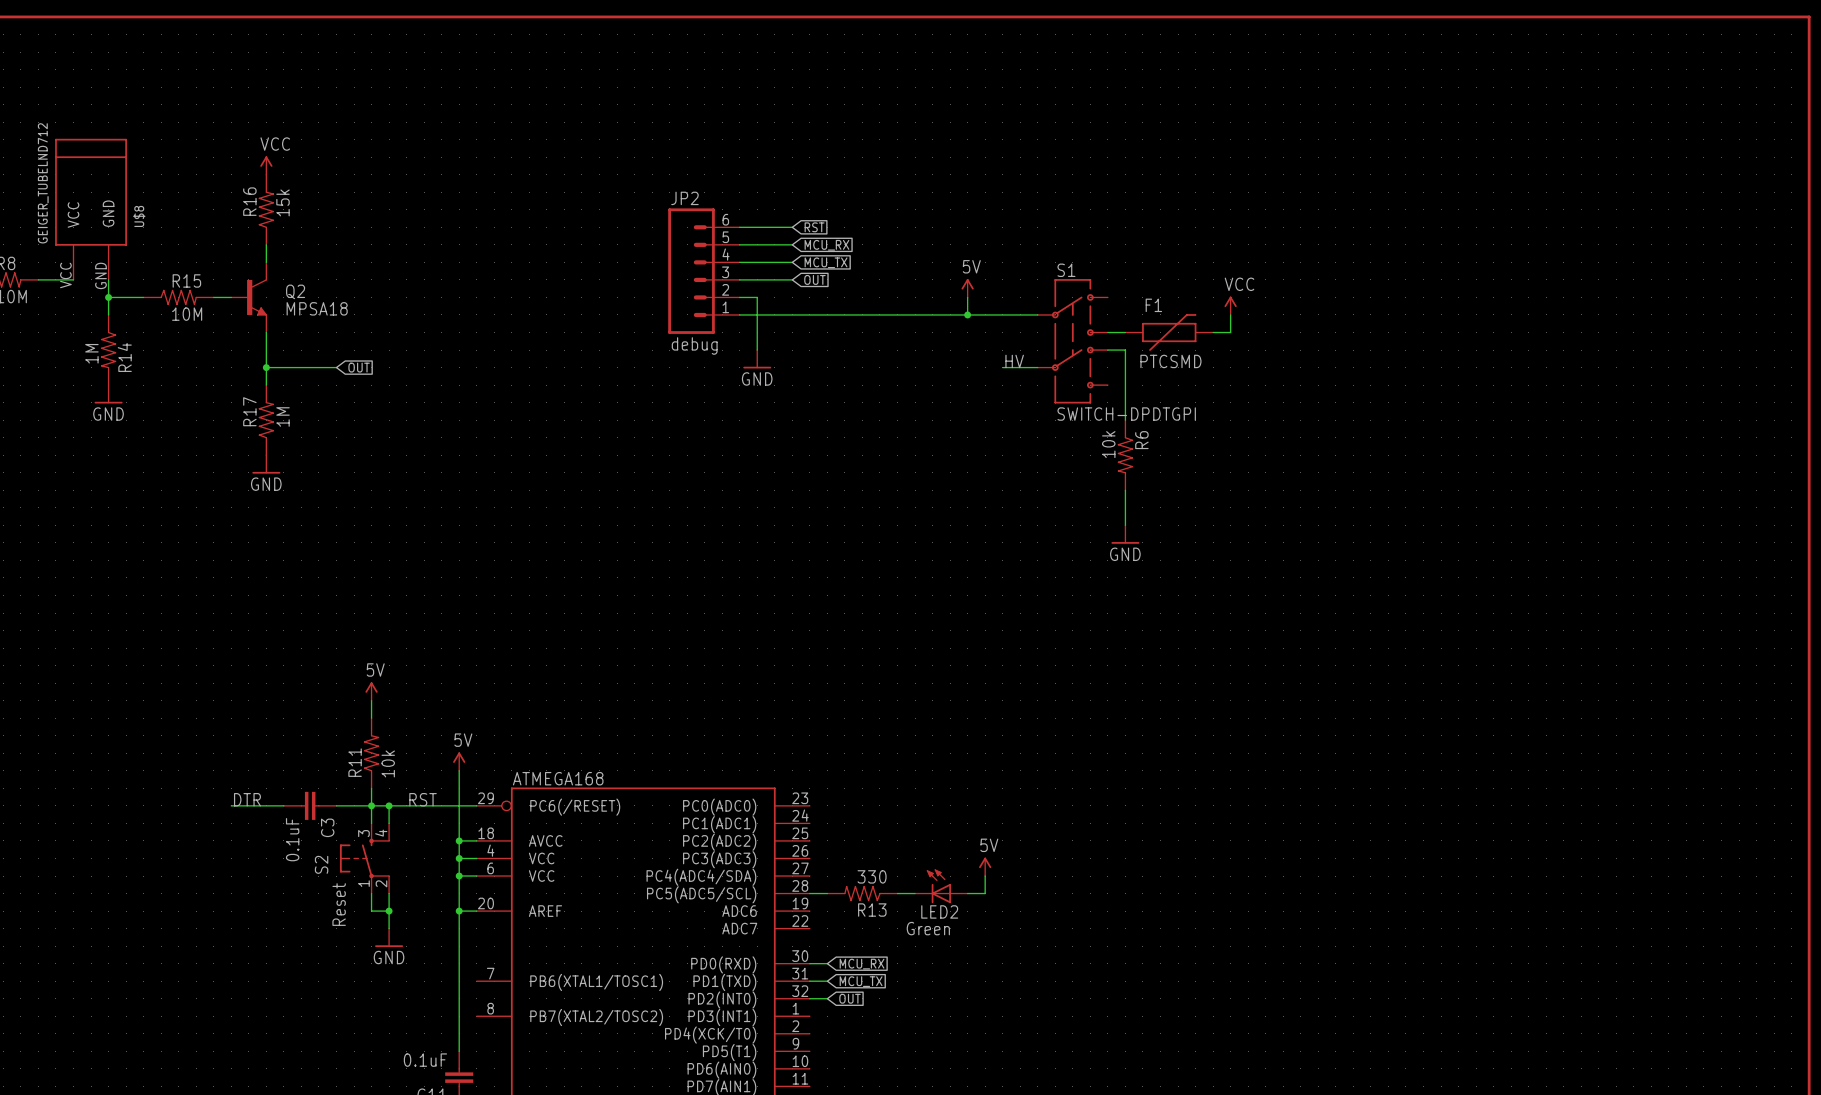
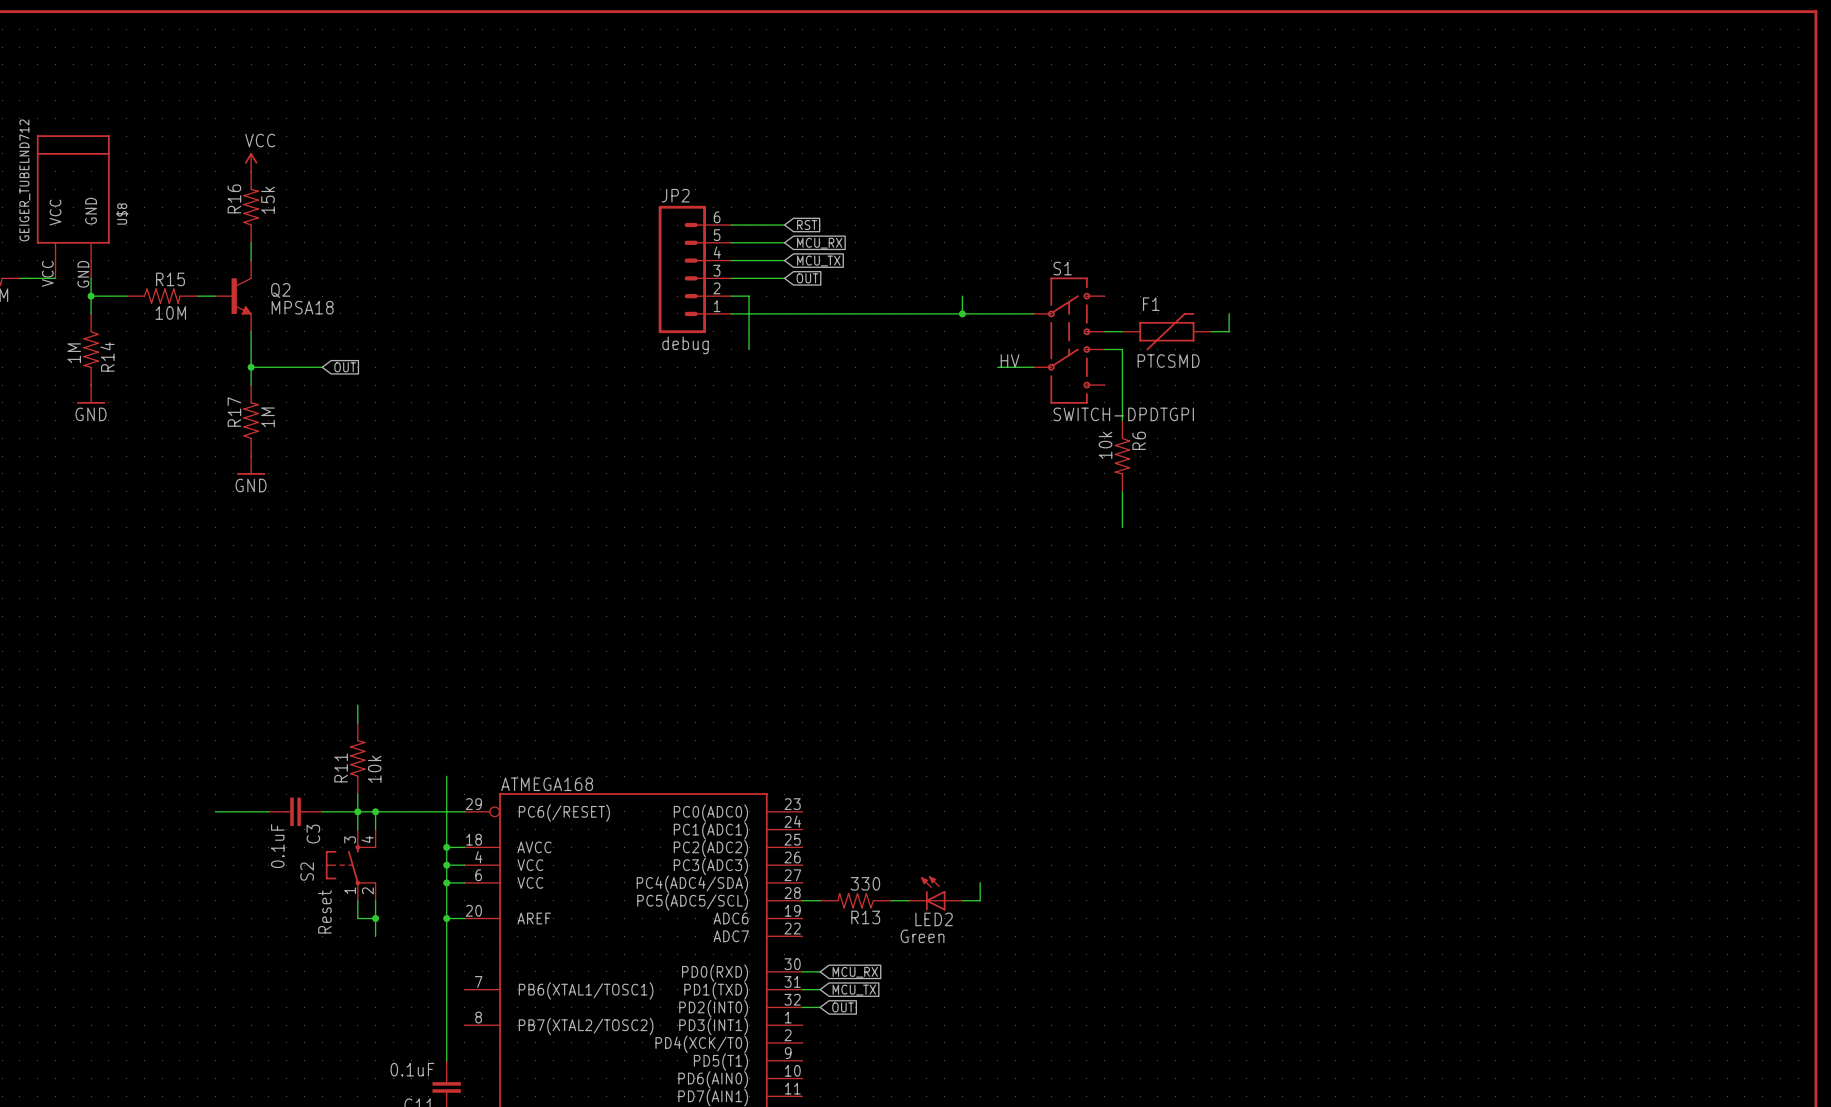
power symbol: 5V (967, 288) -> none
power symbol: VCC (1230, 305) -> none
power symbol: GND (757, 359) -> none
power symbol: GND (1125, 534) -> none
power symbol: 5V (371, 691) -> none
power symbol: 5V (459, 761) -> none
label: DTR (247, 799) -> none
label: RST (423, 799) -> none
power symbol: 5V (985, 866) -> none
power symbol: GND (389, 937) -> none

